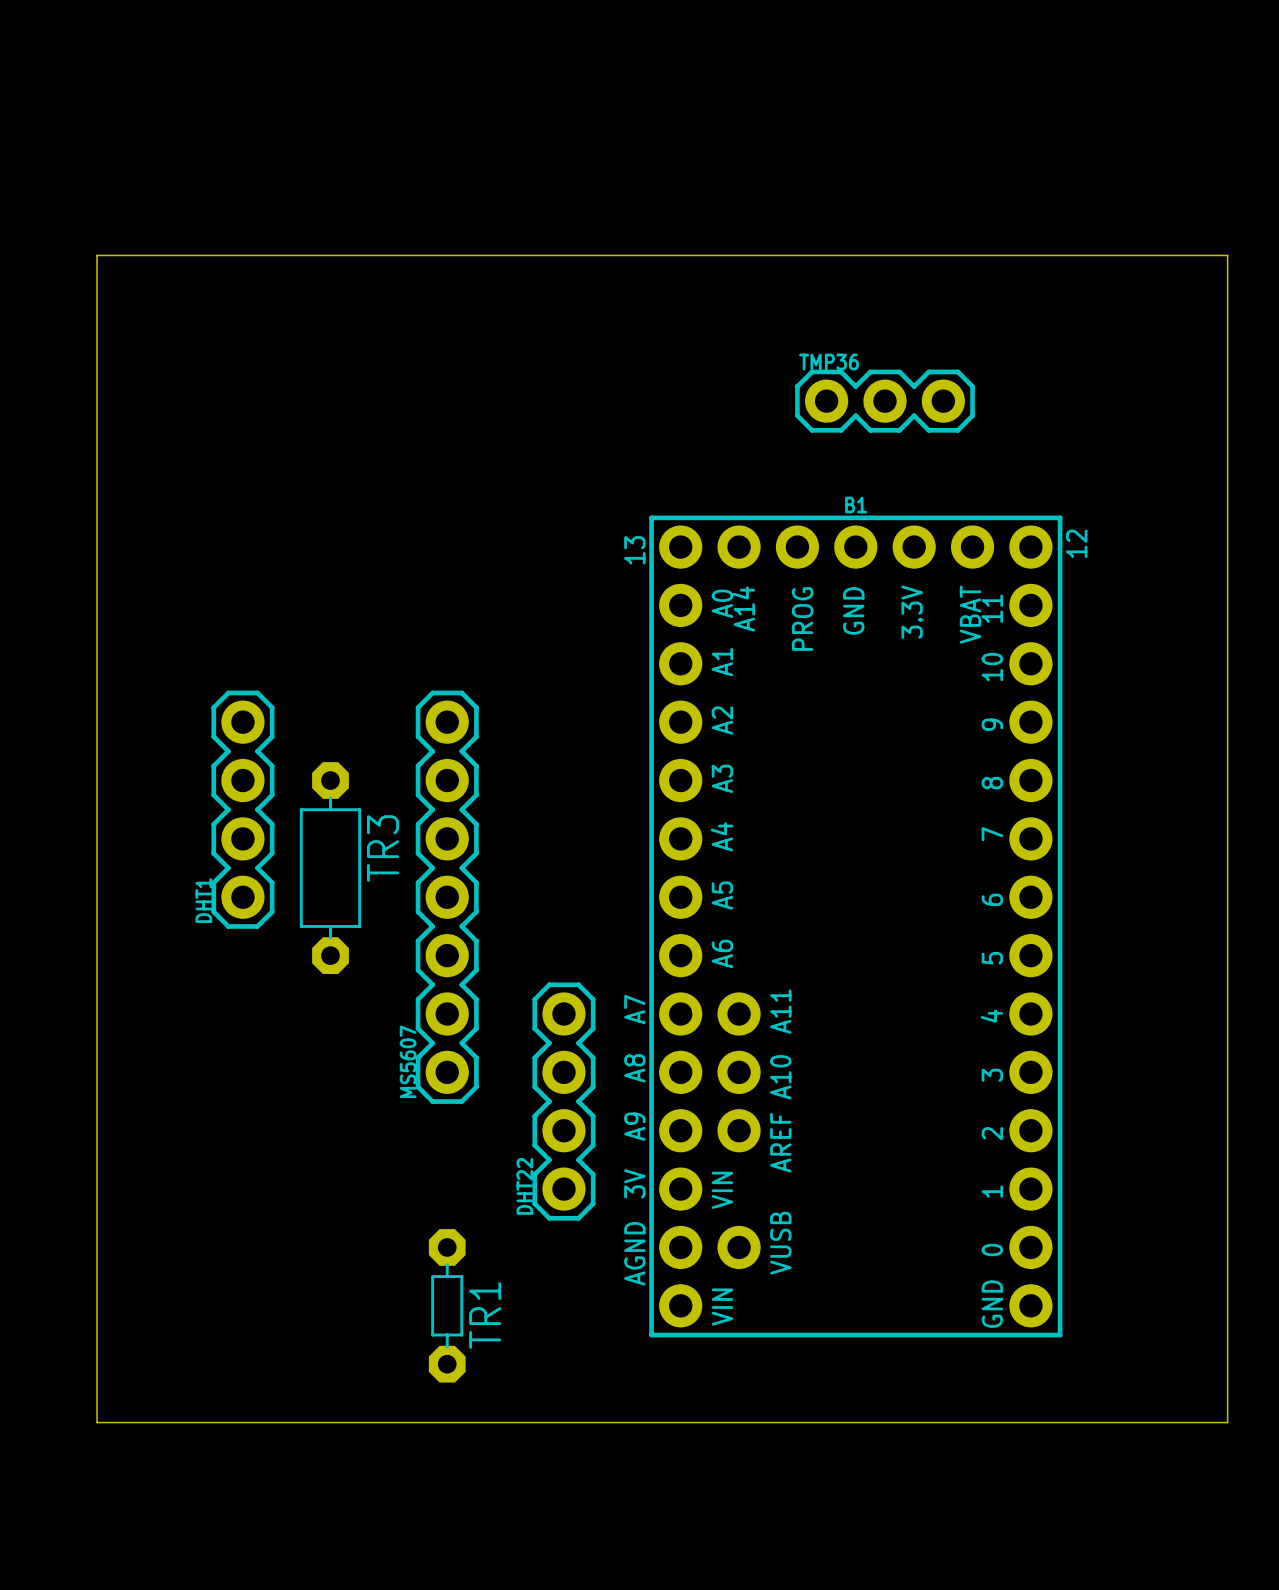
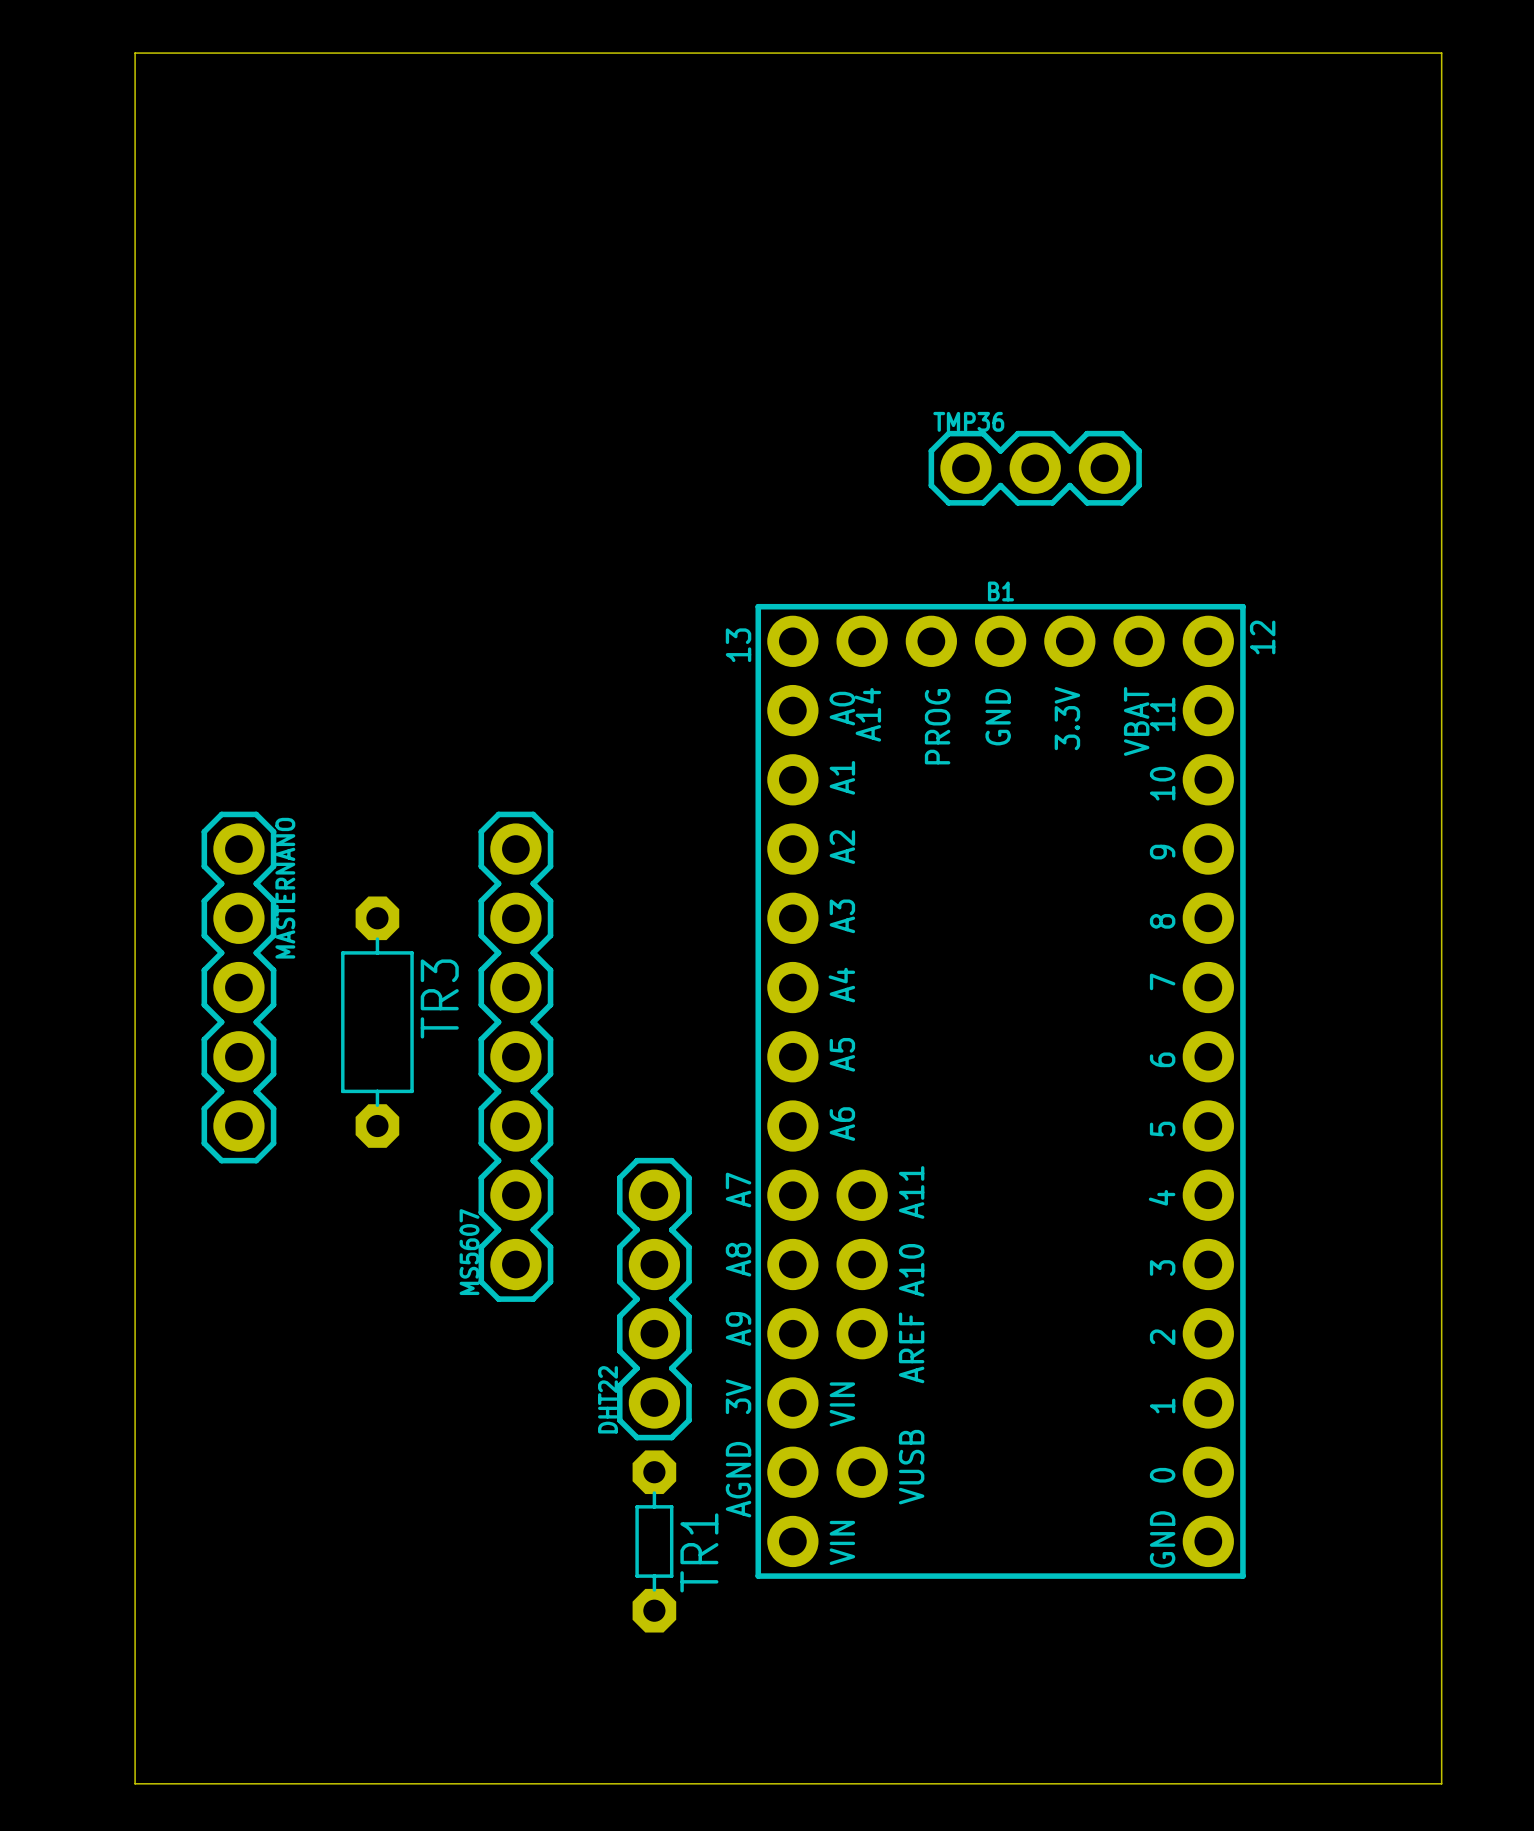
board edge: (1227, 255) (97, 255) (97, 1422) (1227, 1422) -> (1441, 295) (1441, 53) (135, 53) (135, 1783) (1441, 1783) (1441, 1679)
DHT1: (242, 809) -> none
MASTERNANO: none -> (238, 987)
TR1 position: (447, 1305) -> (654, 1541)

